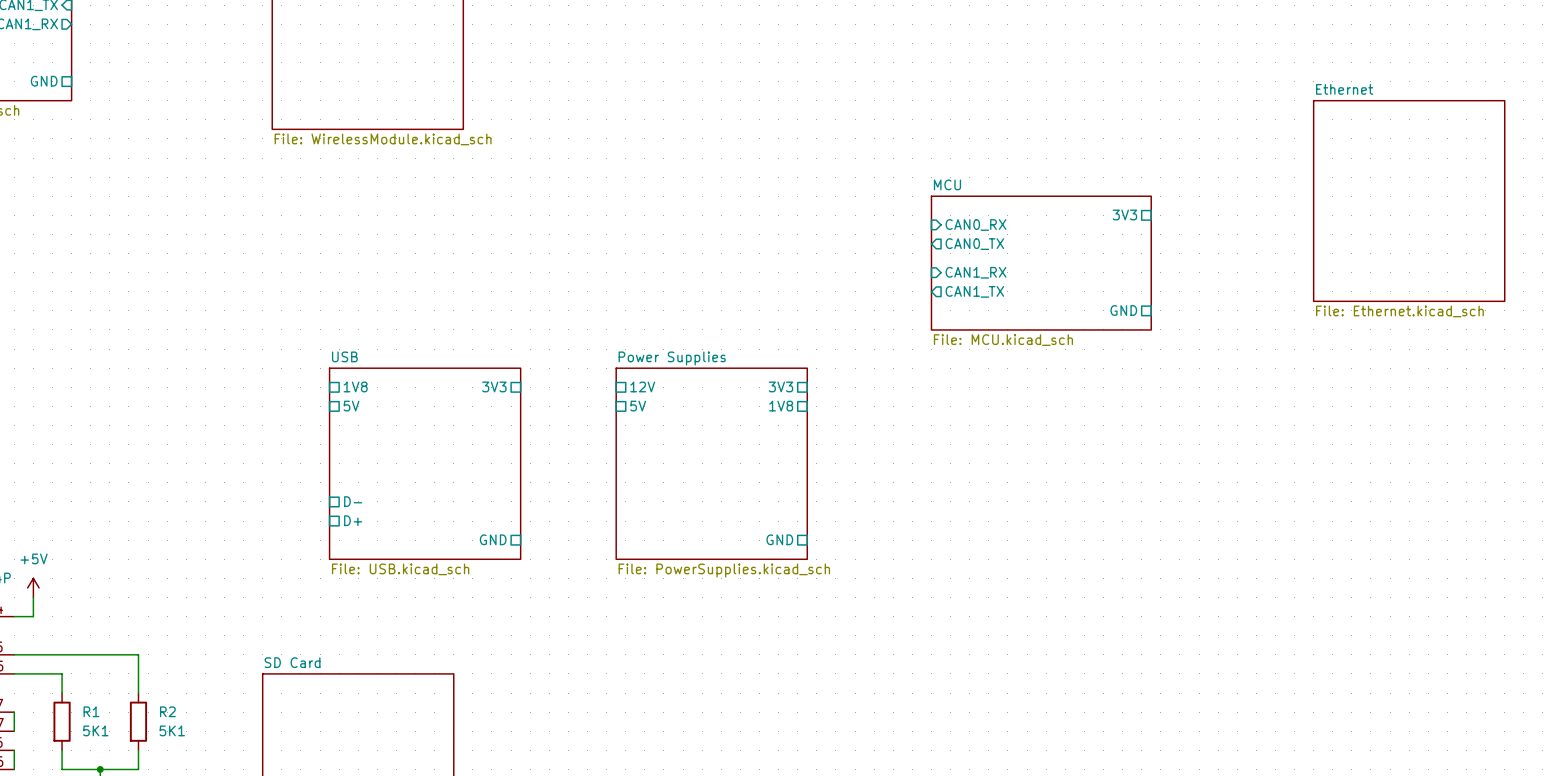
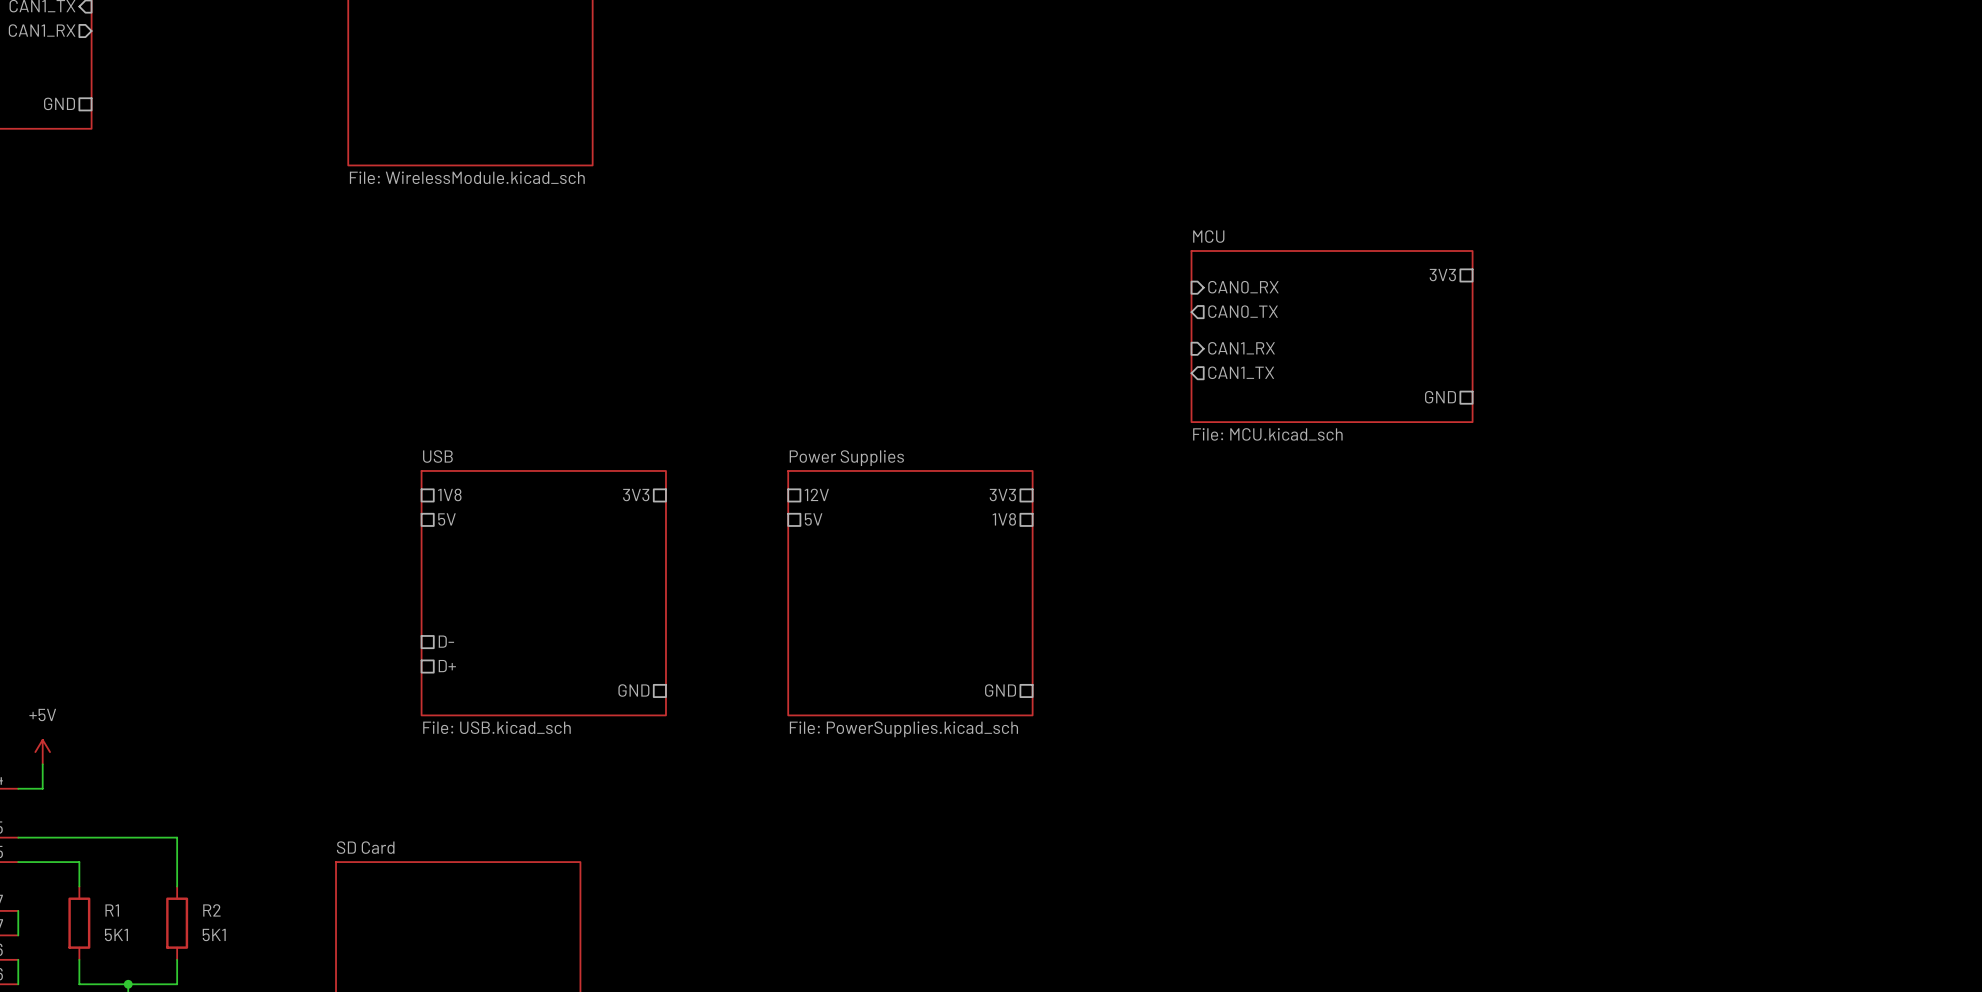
sheet Ethernet: File: Ethernet.kicad_sch (1409, 201) -> none

